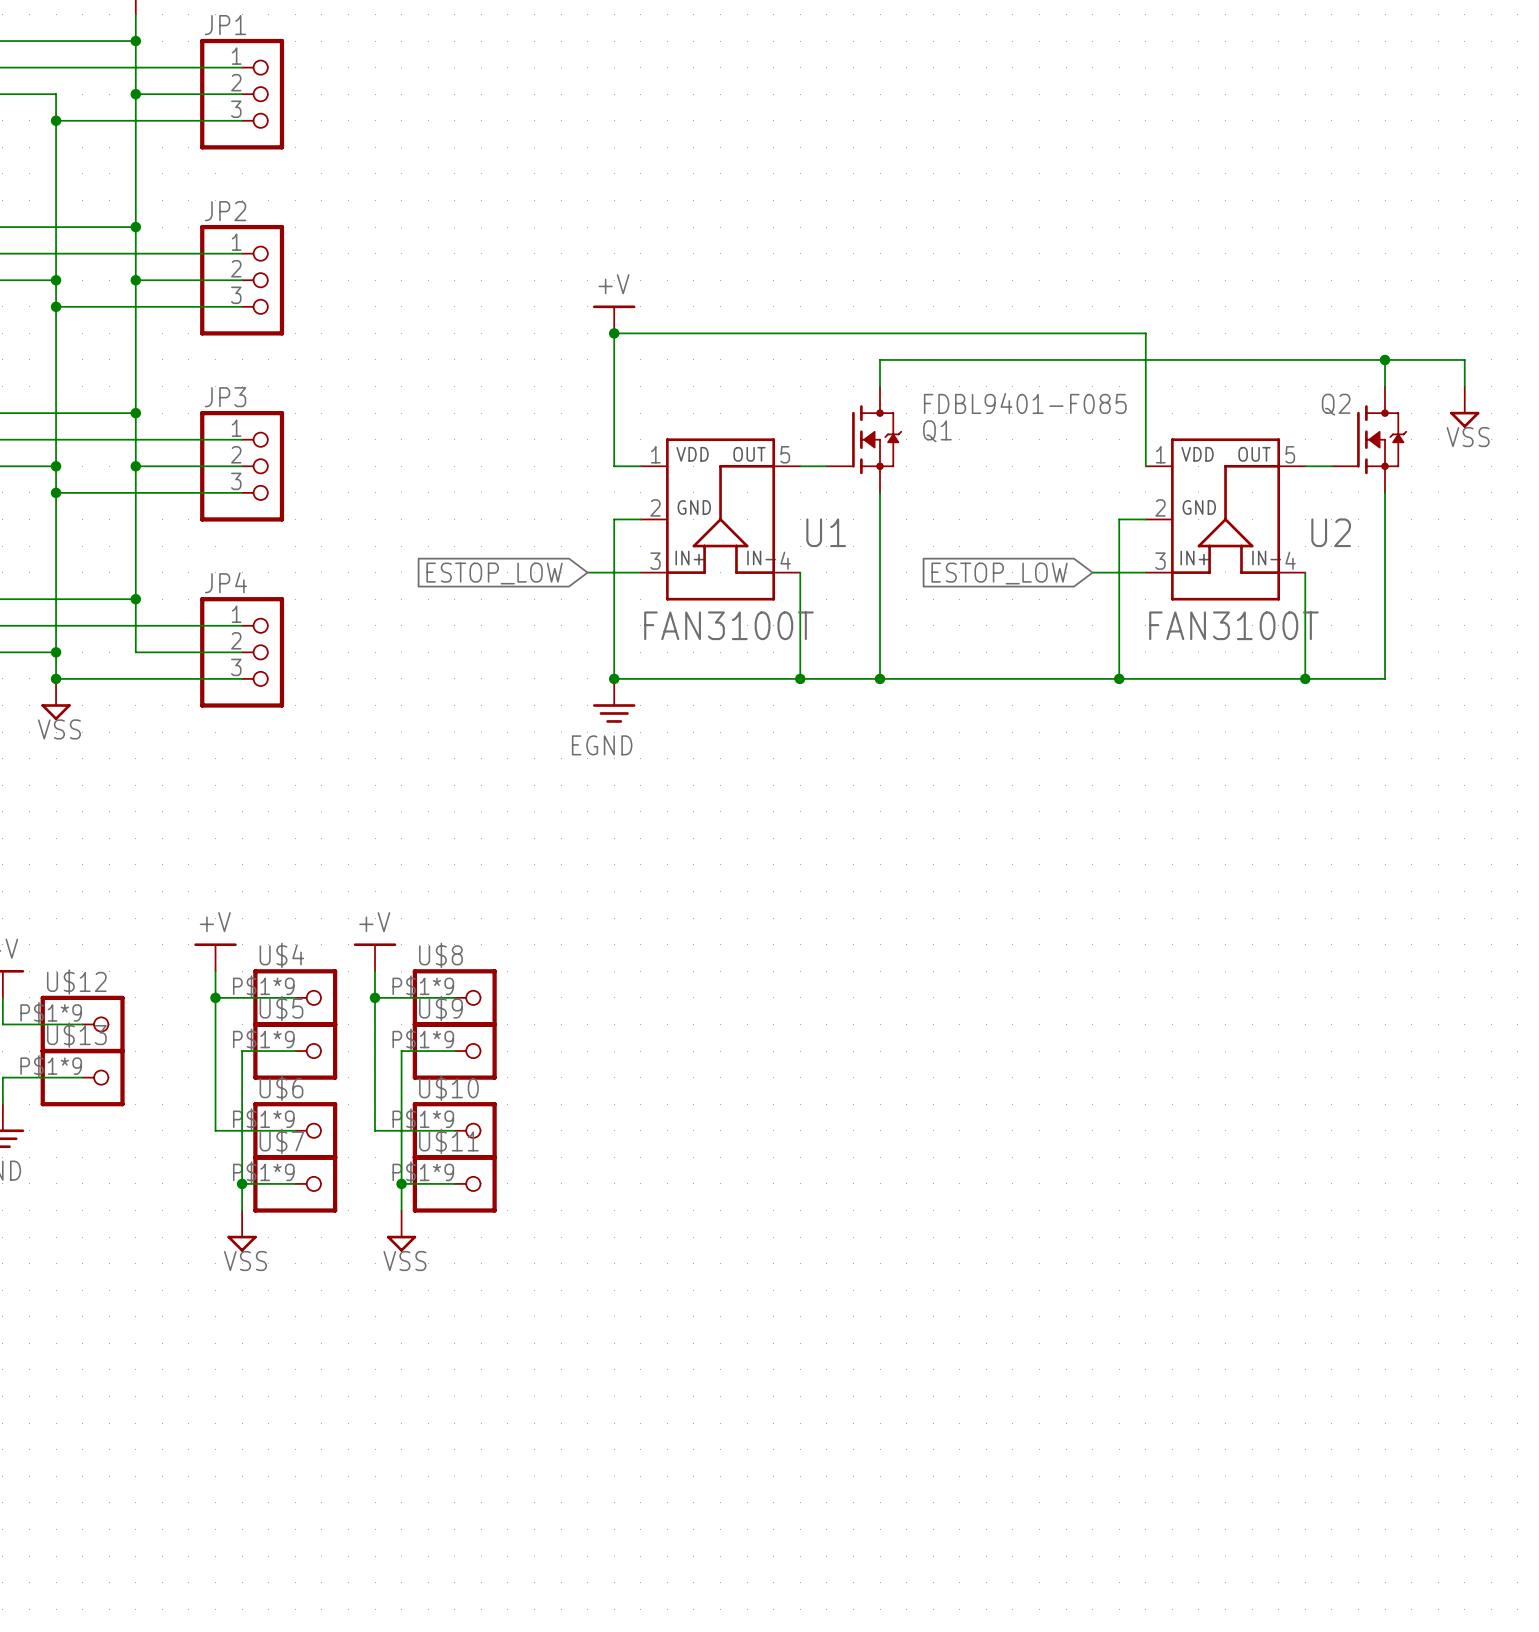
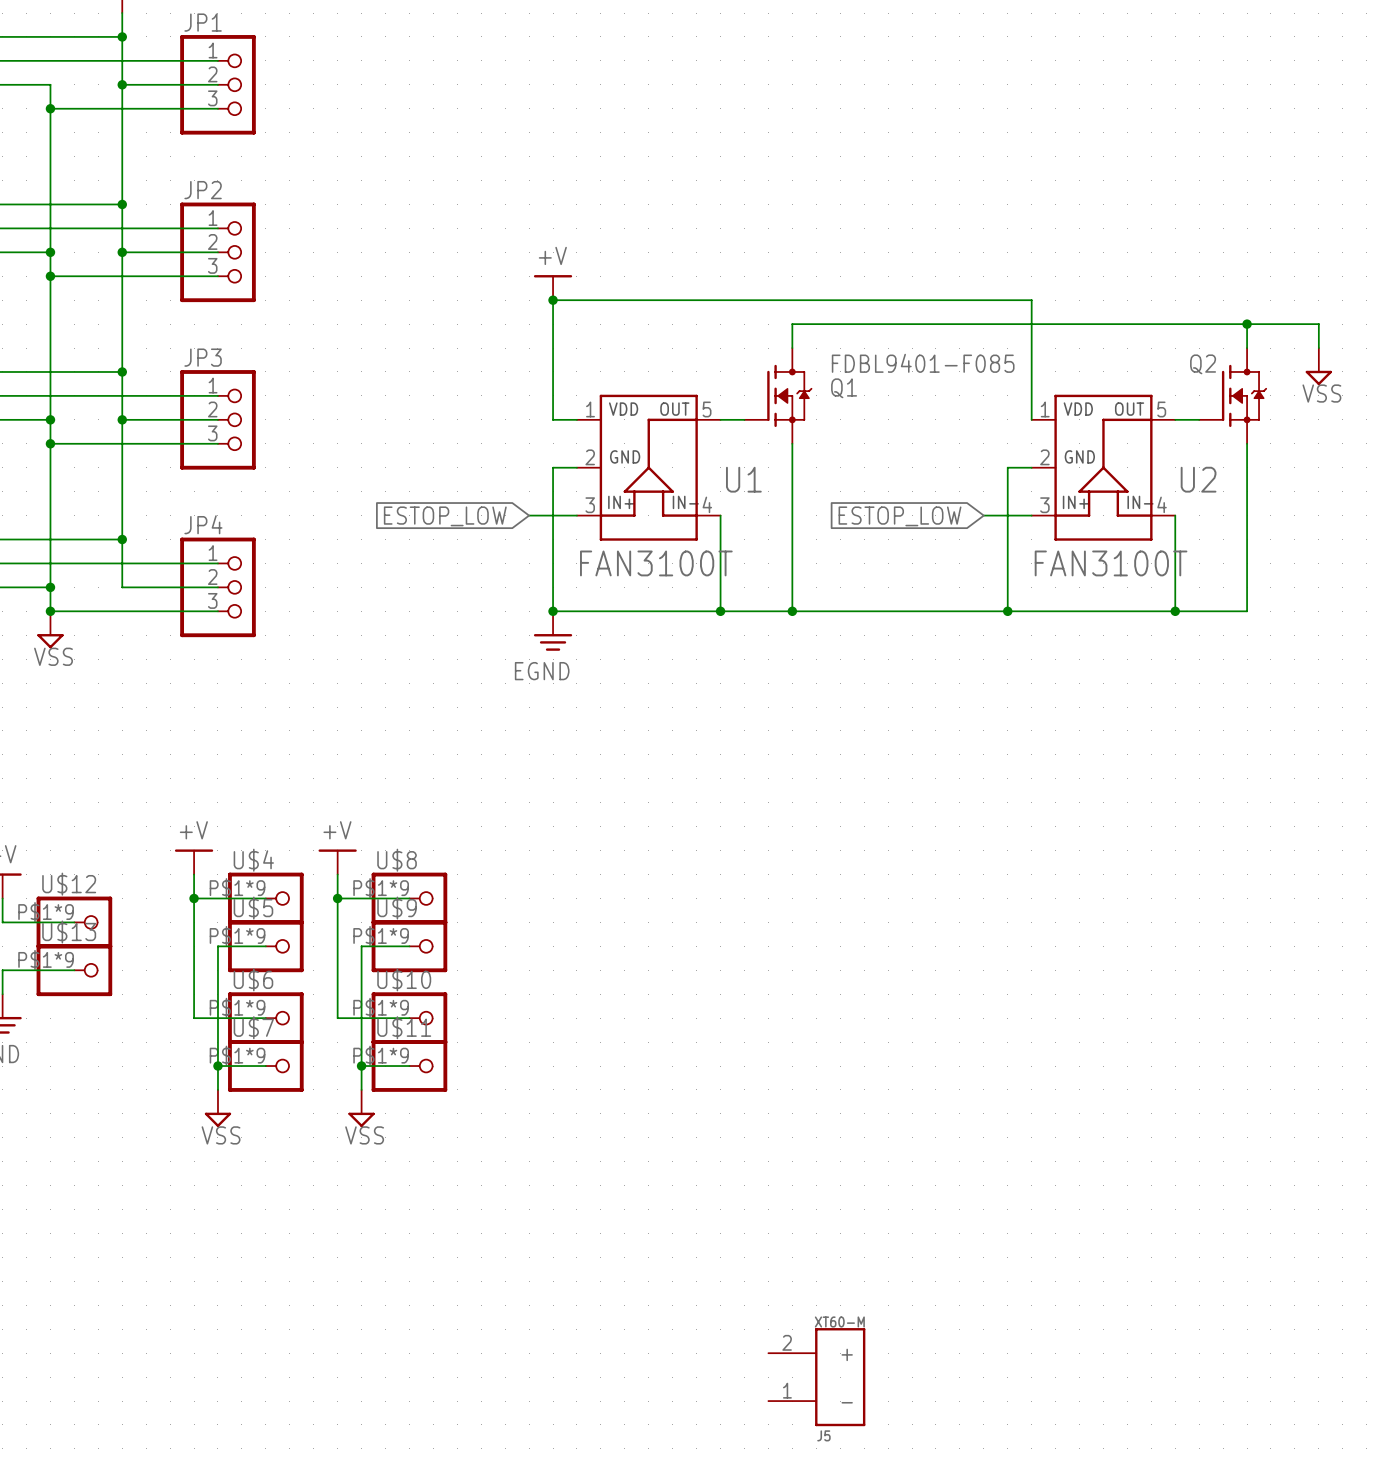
J5: none -> XT60-M (816, 1377)

